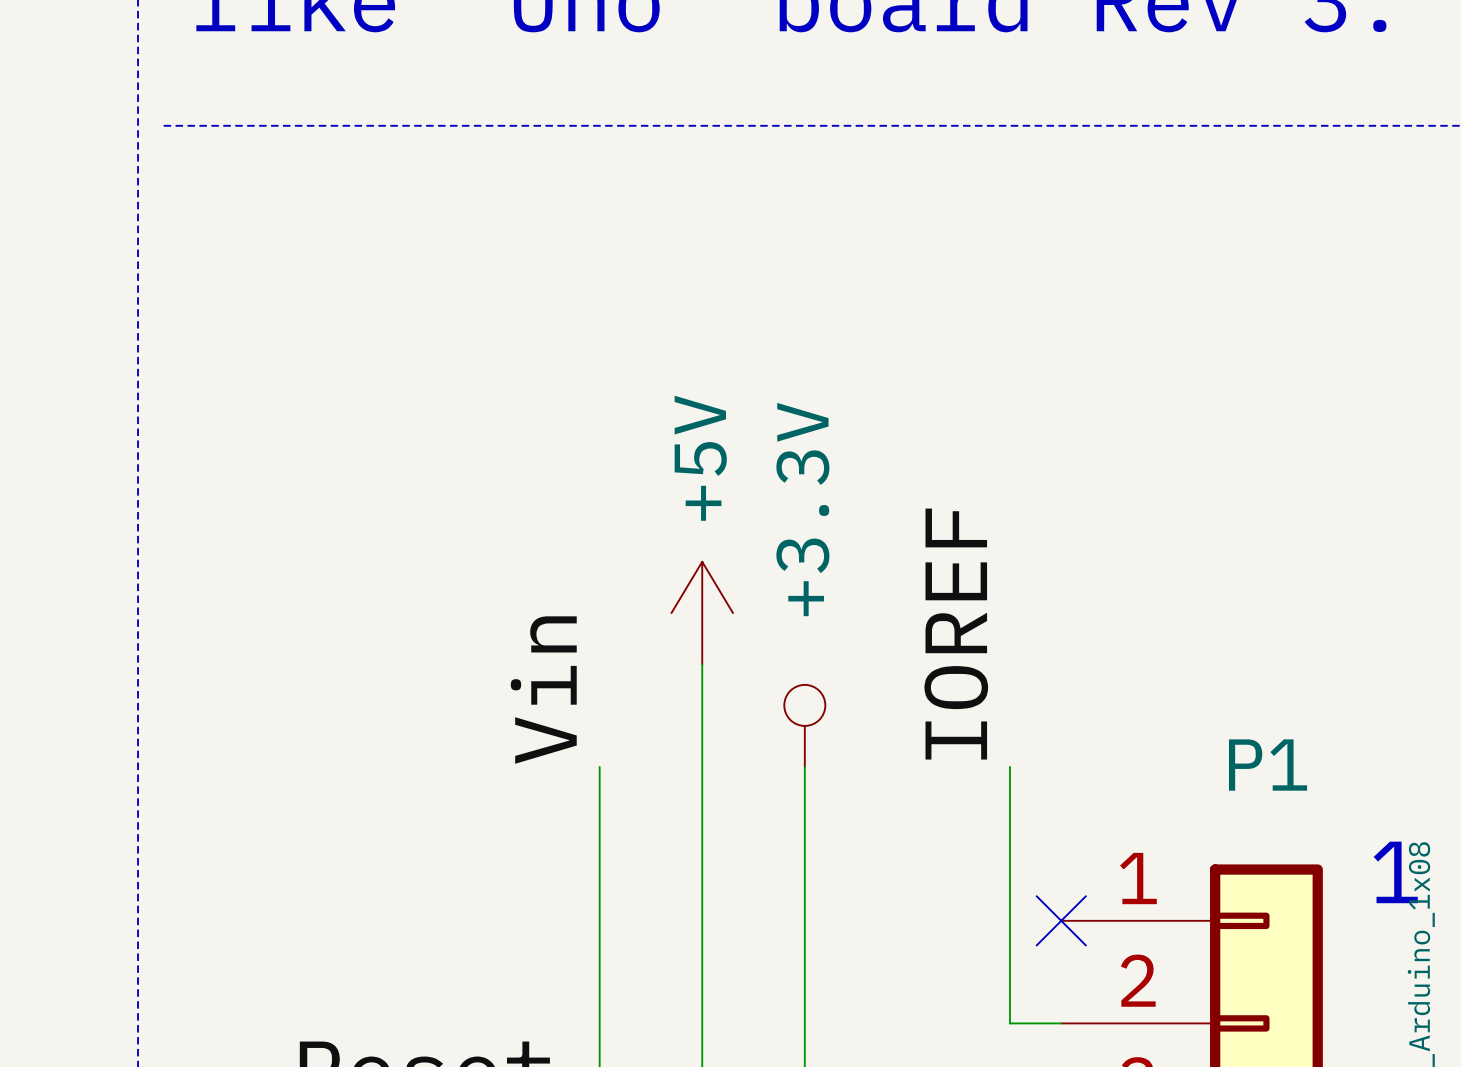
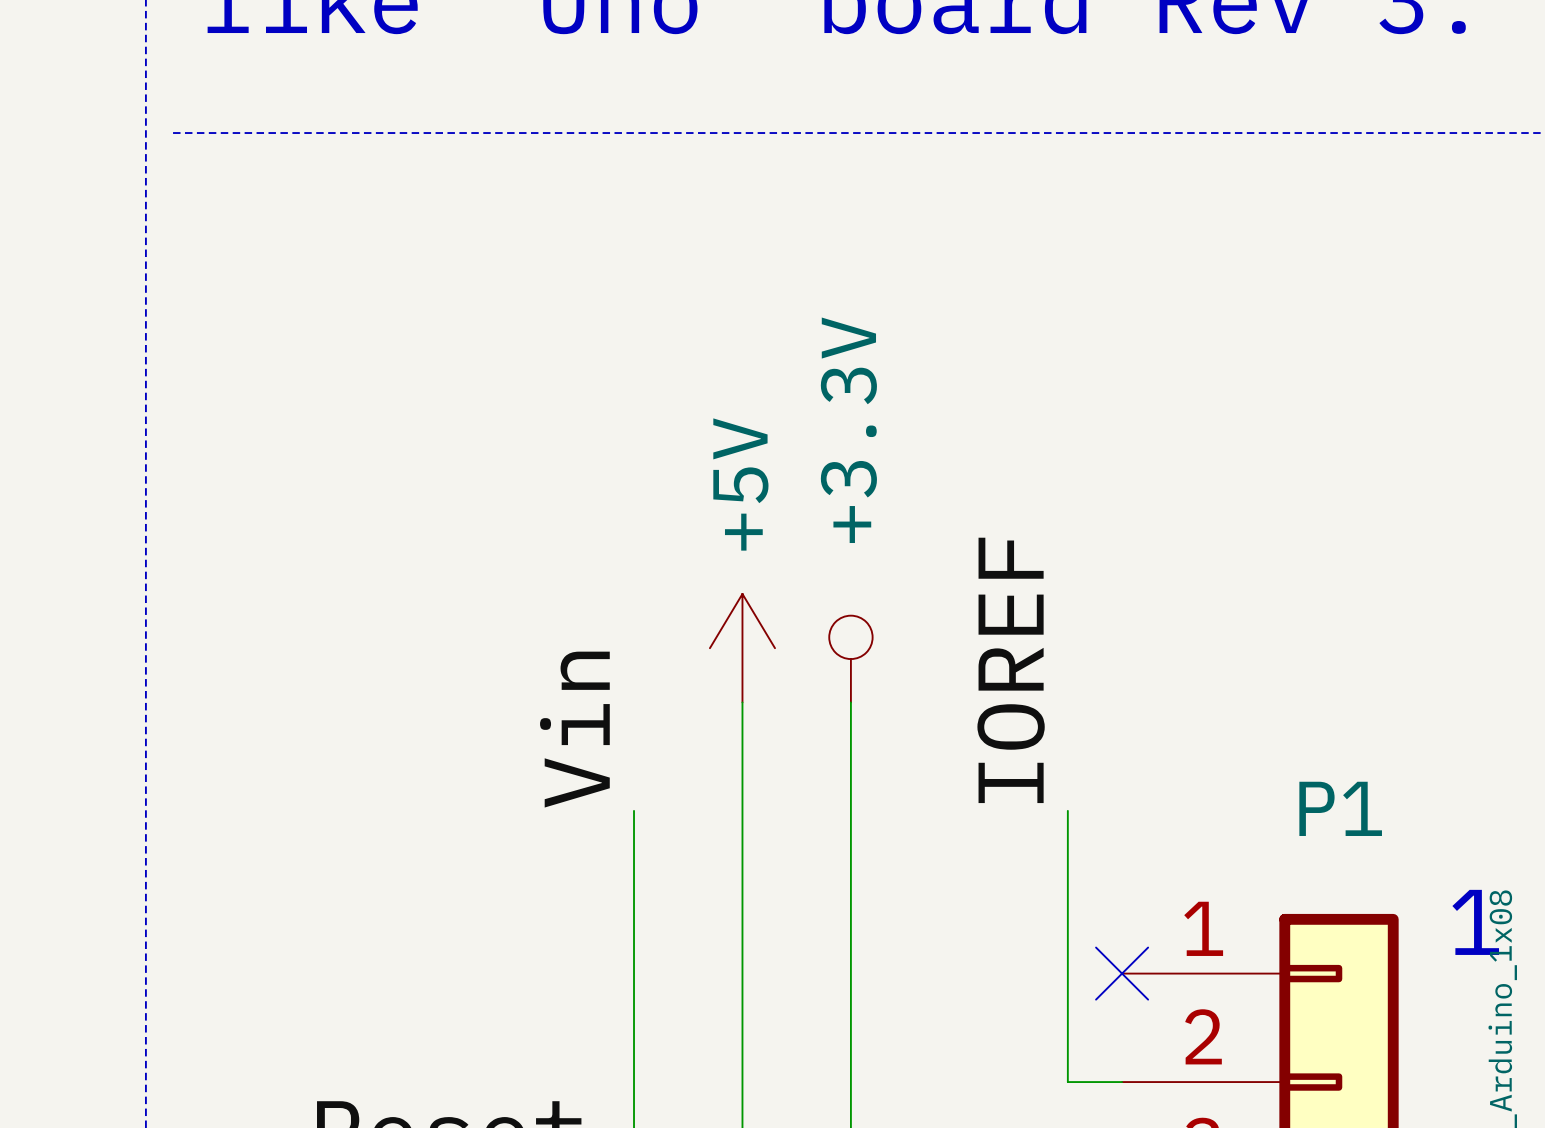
wire: none -> (850, 702) (850, 810)
power symbol position: +3.3V (804, 725) -> +3.3V (850, 659)

